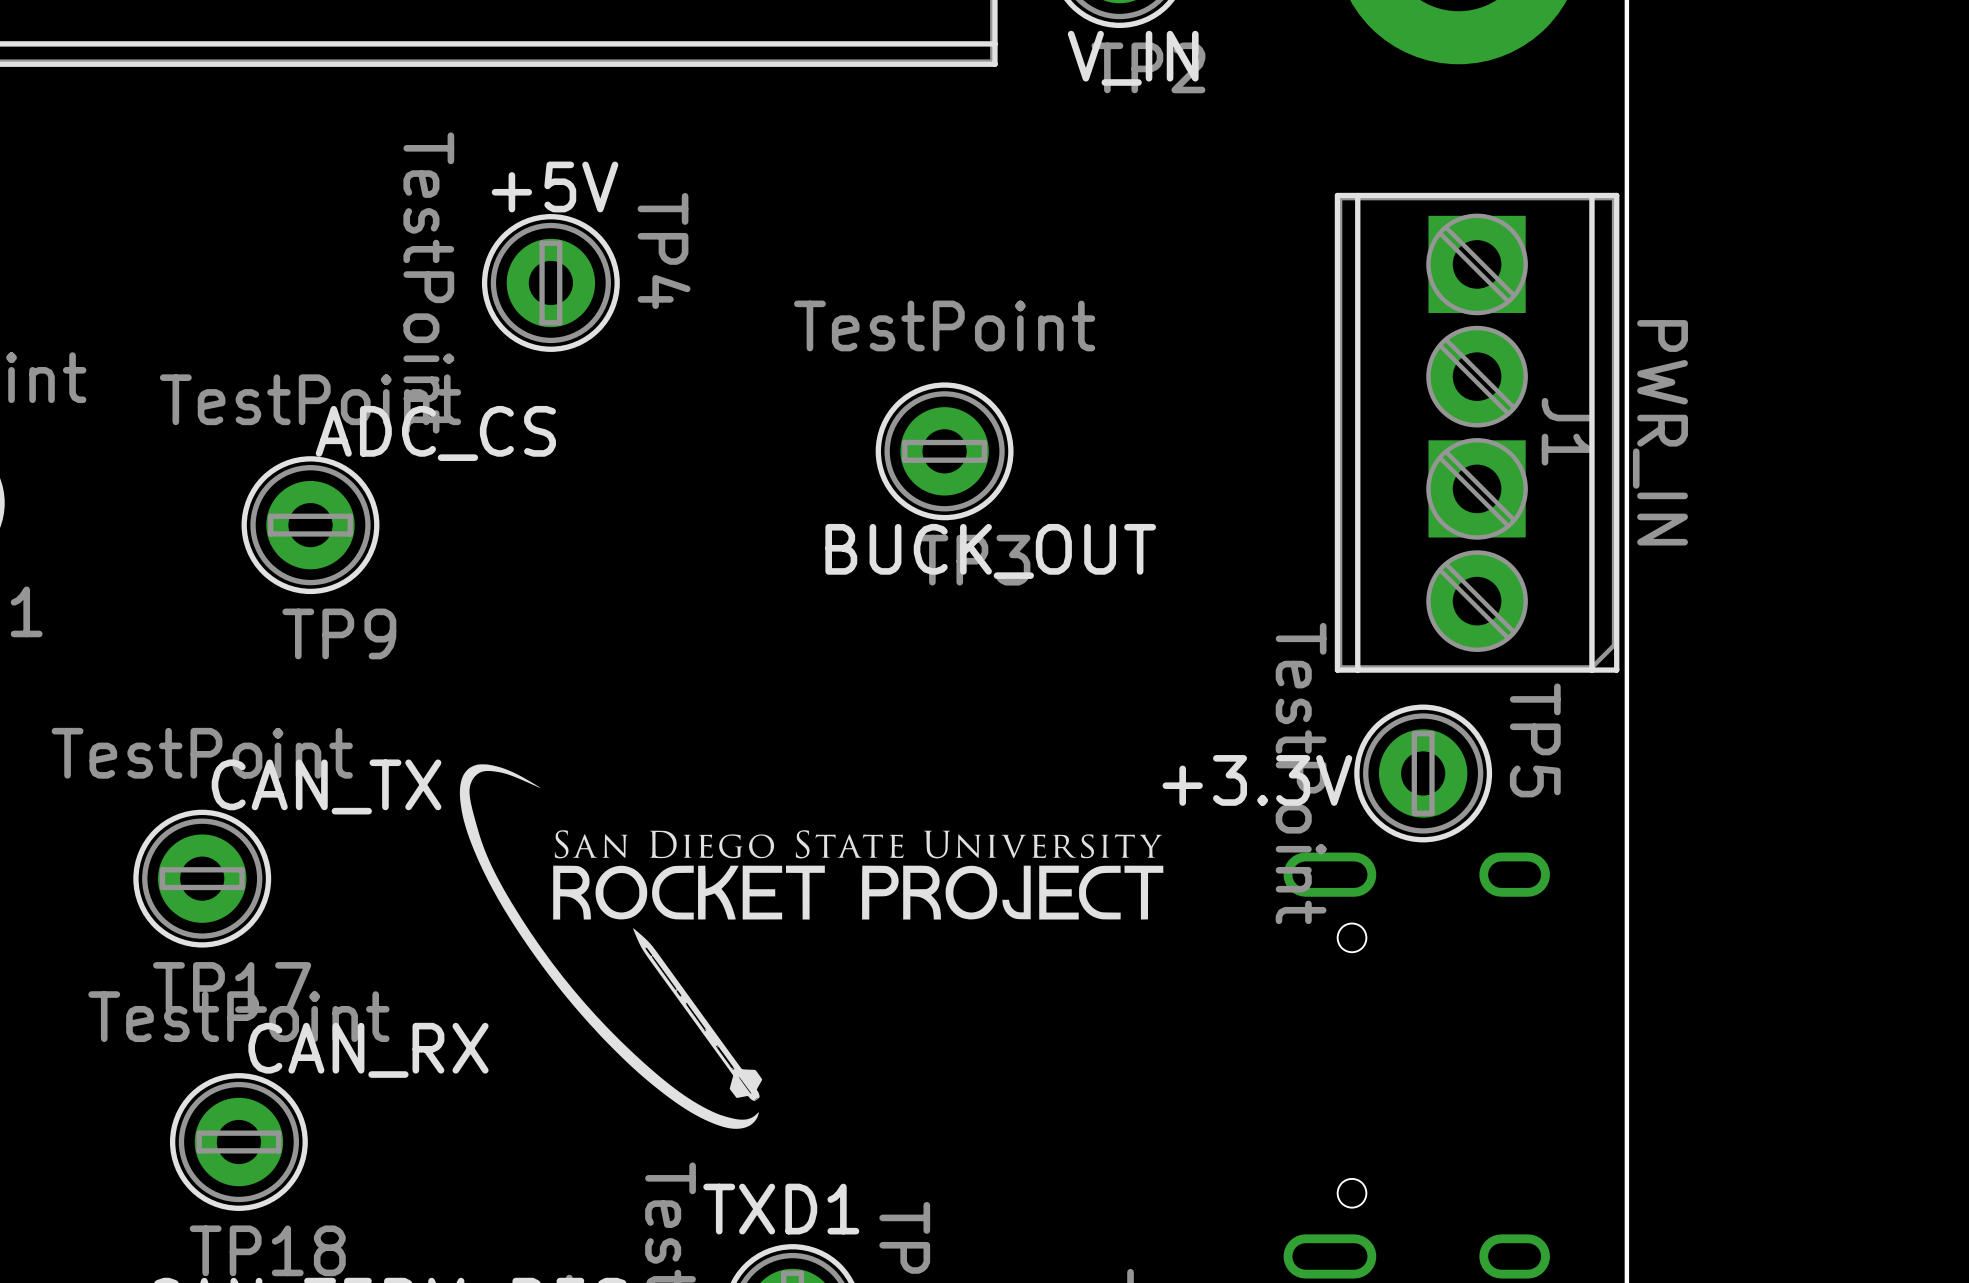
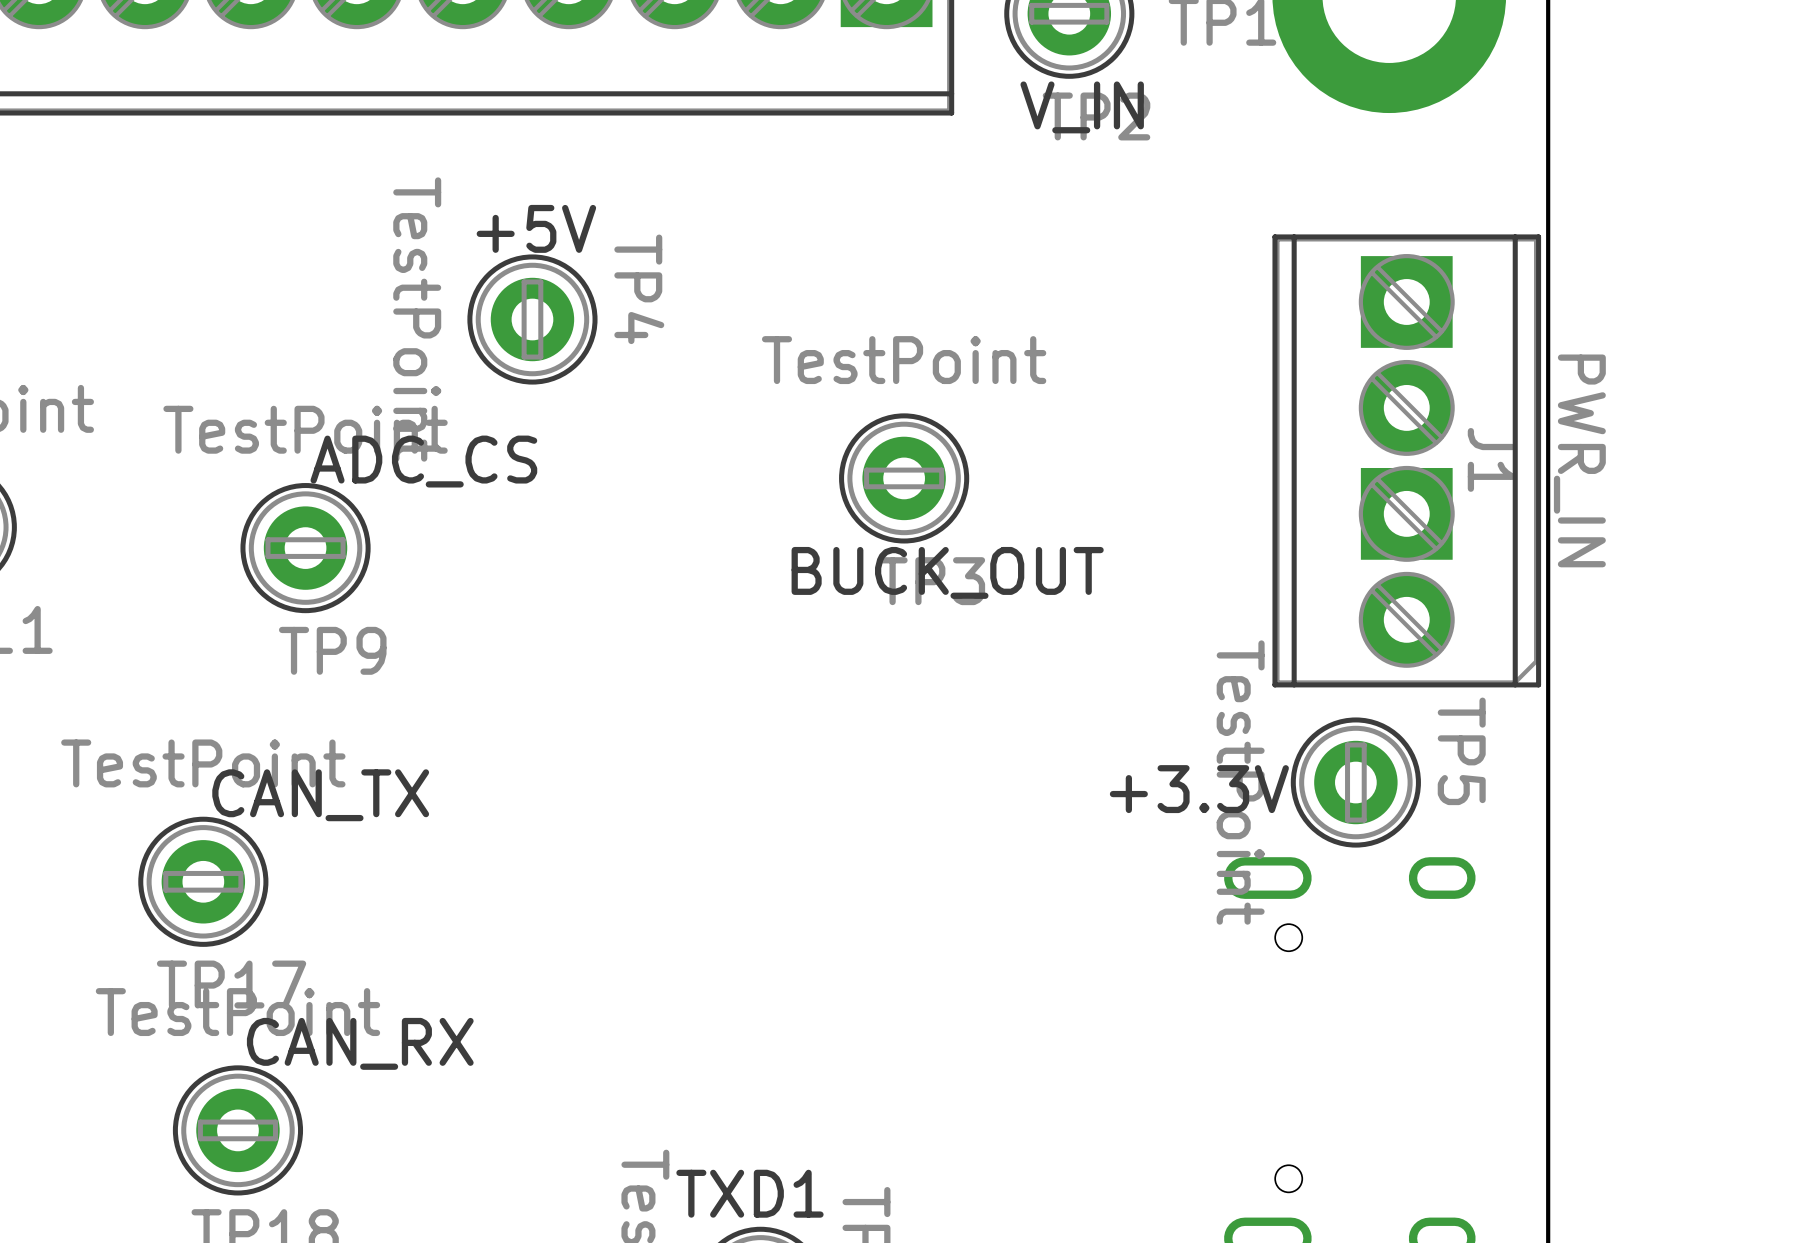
drawing: [459, 764, 1164, 1129] -> none

